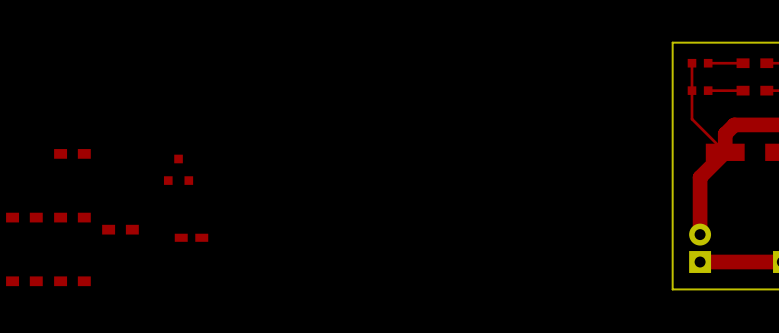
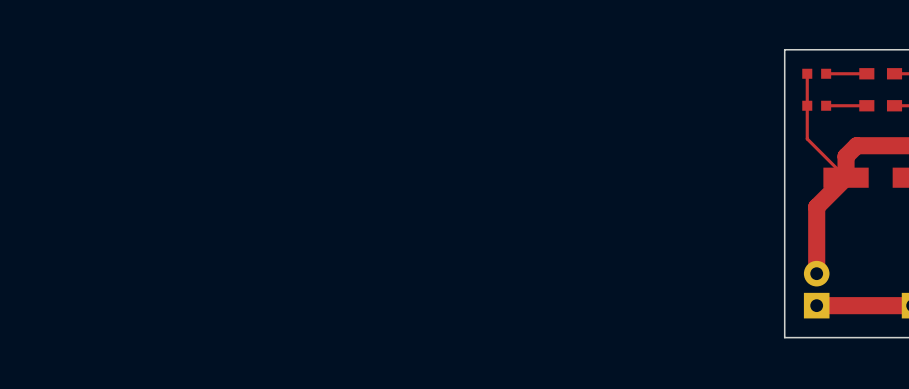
part: (72, 153) -> none
part: (178, 169) -> none
part: (24, 217) -> none
part: (72, 217) -> none
part: (120, 229) -> none
part: (191, 237) -> none
part: (24, 281) -> none
part: (72, 281) -> none

